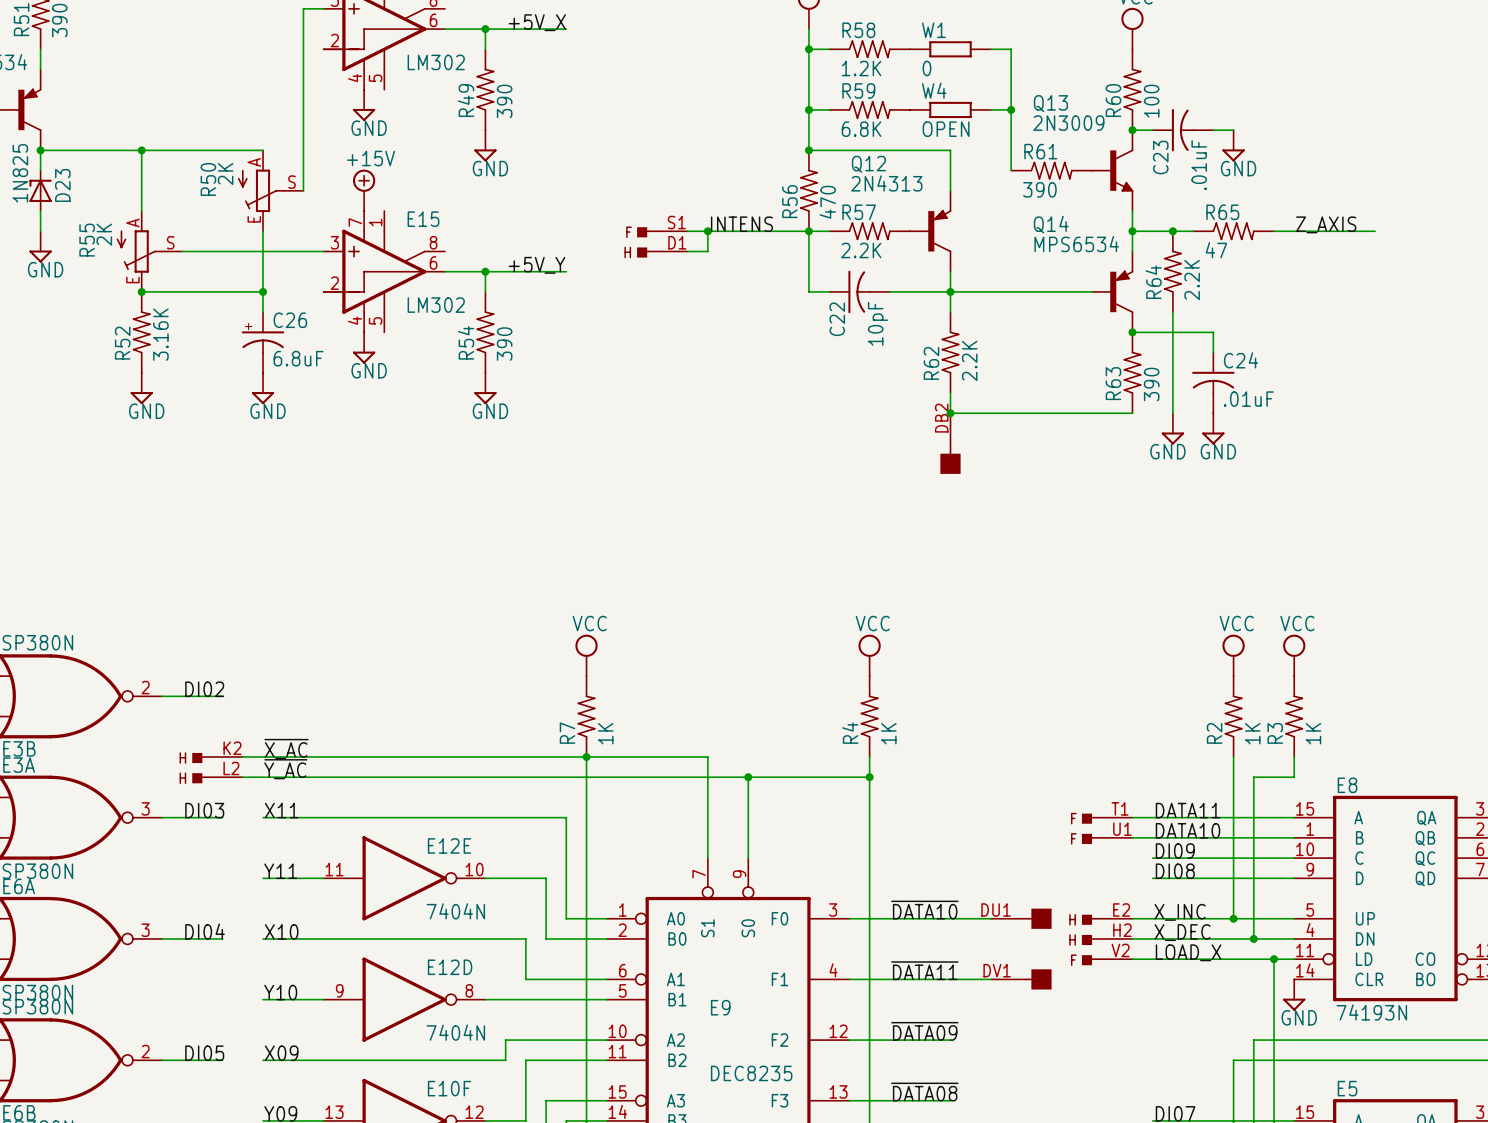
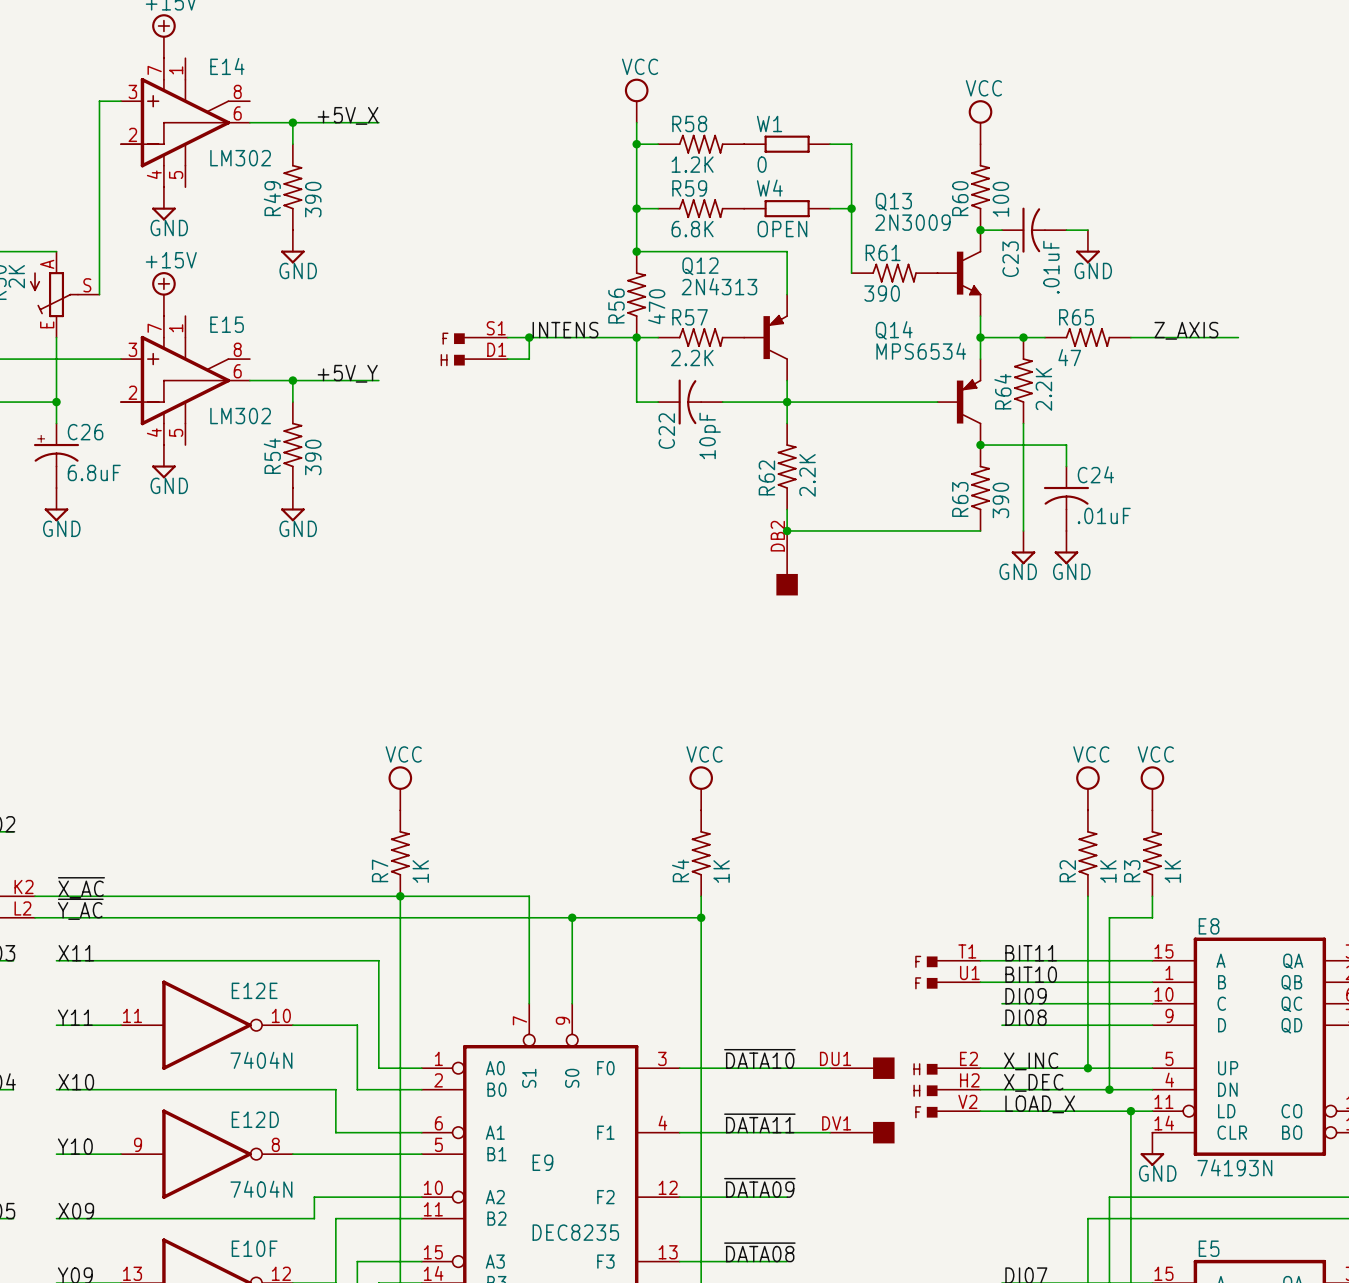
label: DATA11 (1188, 810) -> BIT11 (1031, 953)
label: DATA10 (1188, 830) -> BIT10 (1031, 974)

